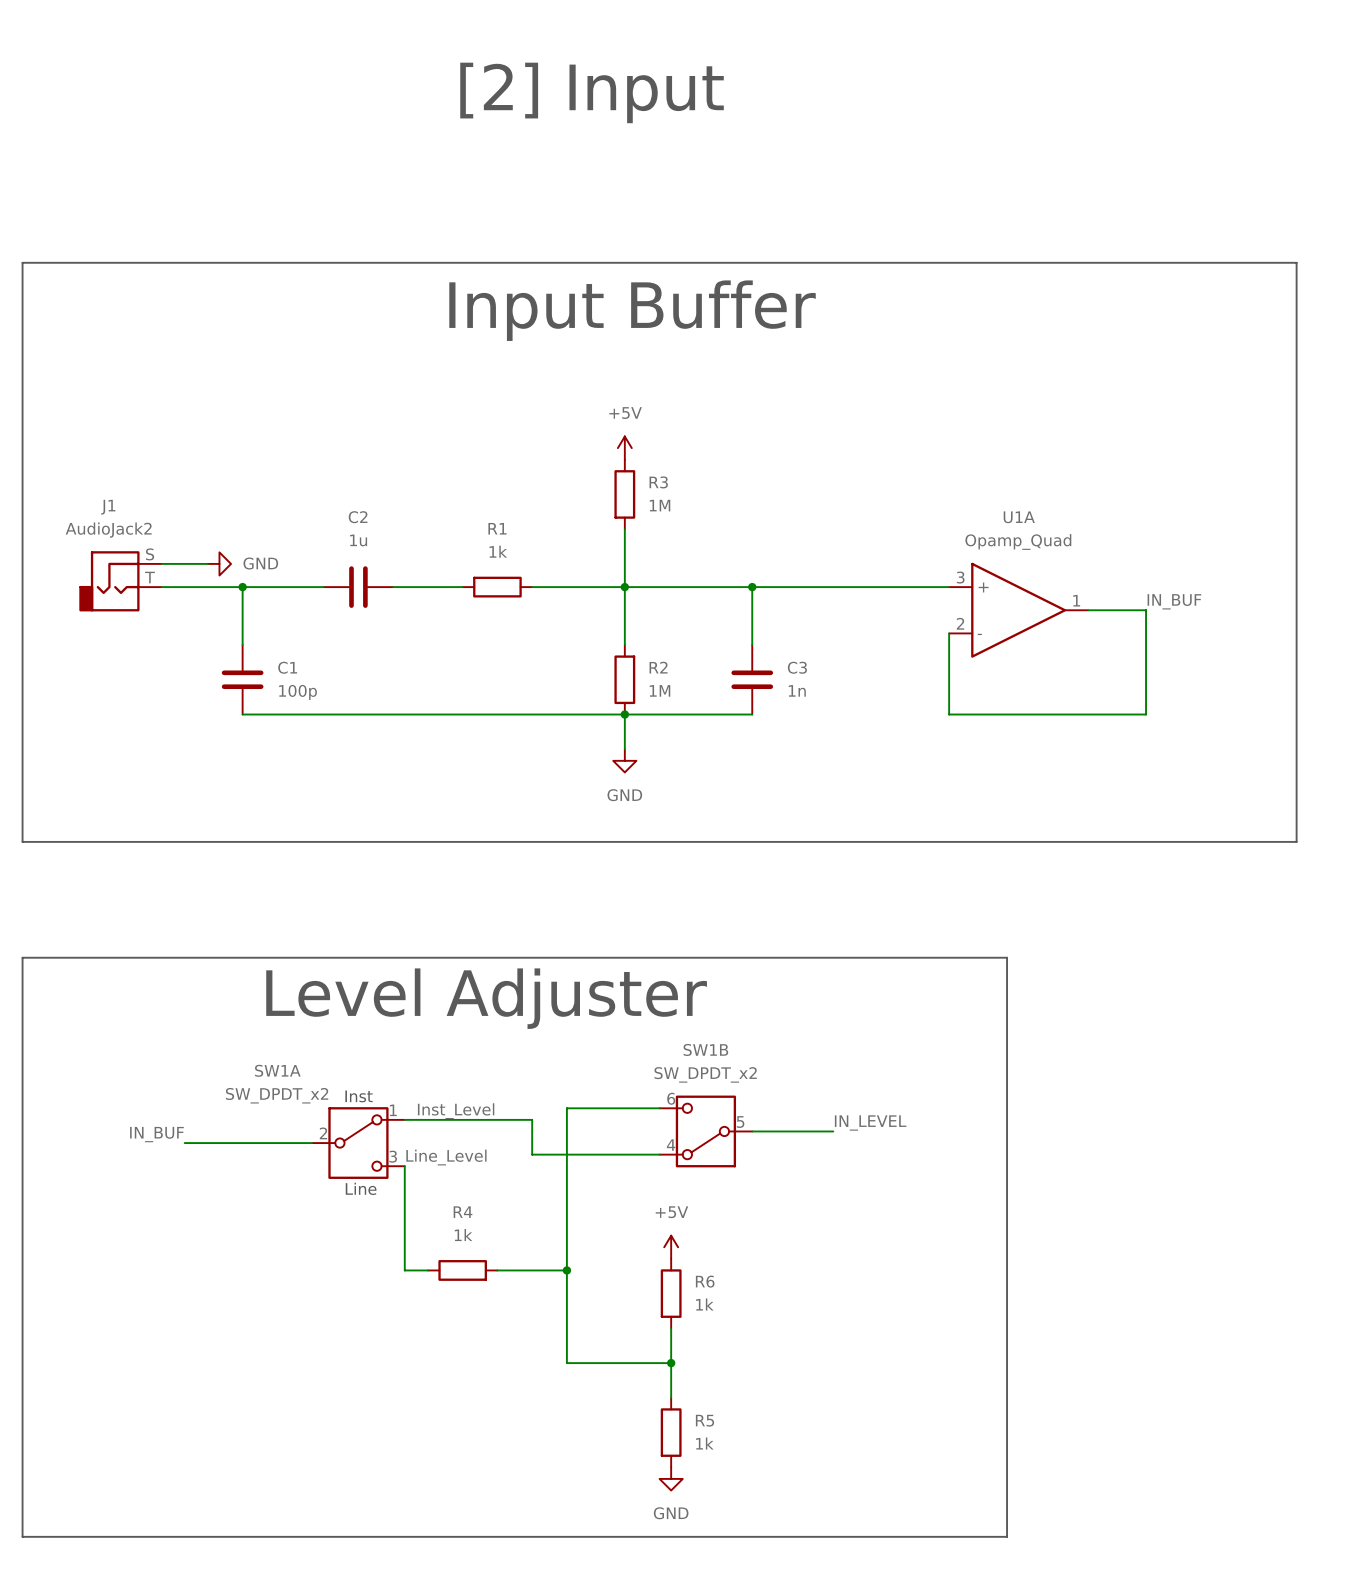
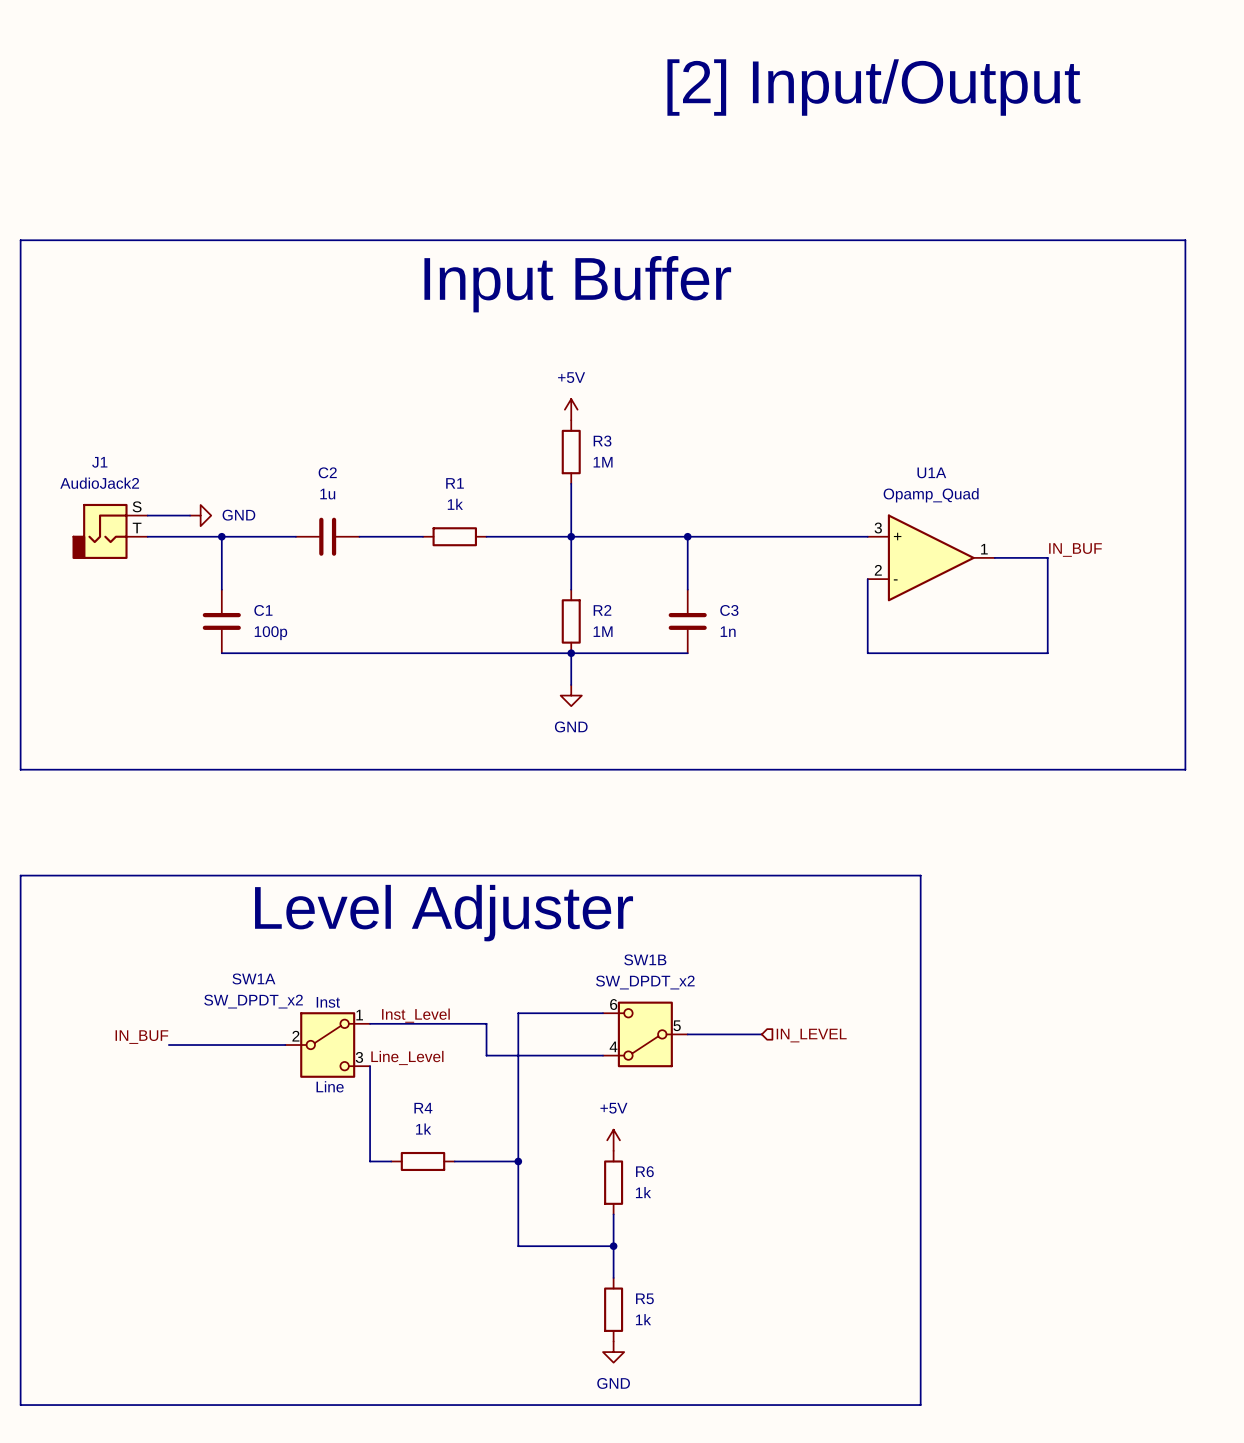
text: [2] Input (592, 92) -> none
text: none -> [2] Input/Output (873, 87)
label: IN_LEVEL (870, 1123) -> none
hierarchical label: none -> IN_LEVEL (811, 1035)

